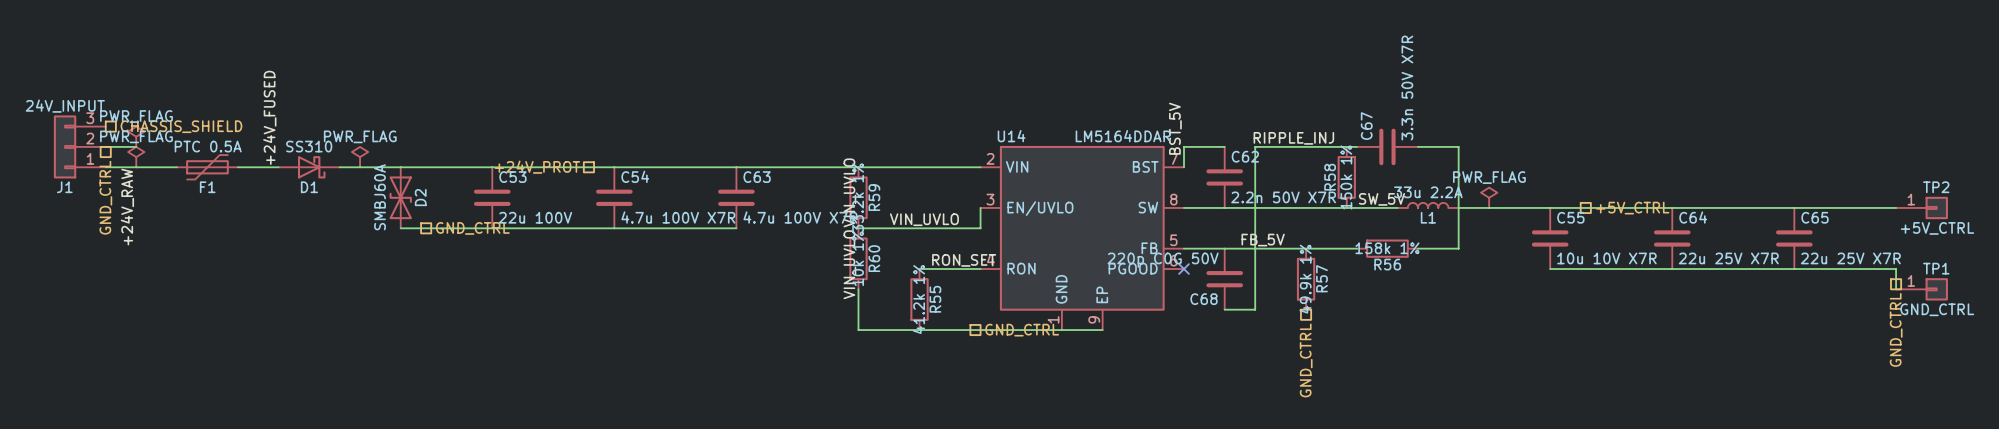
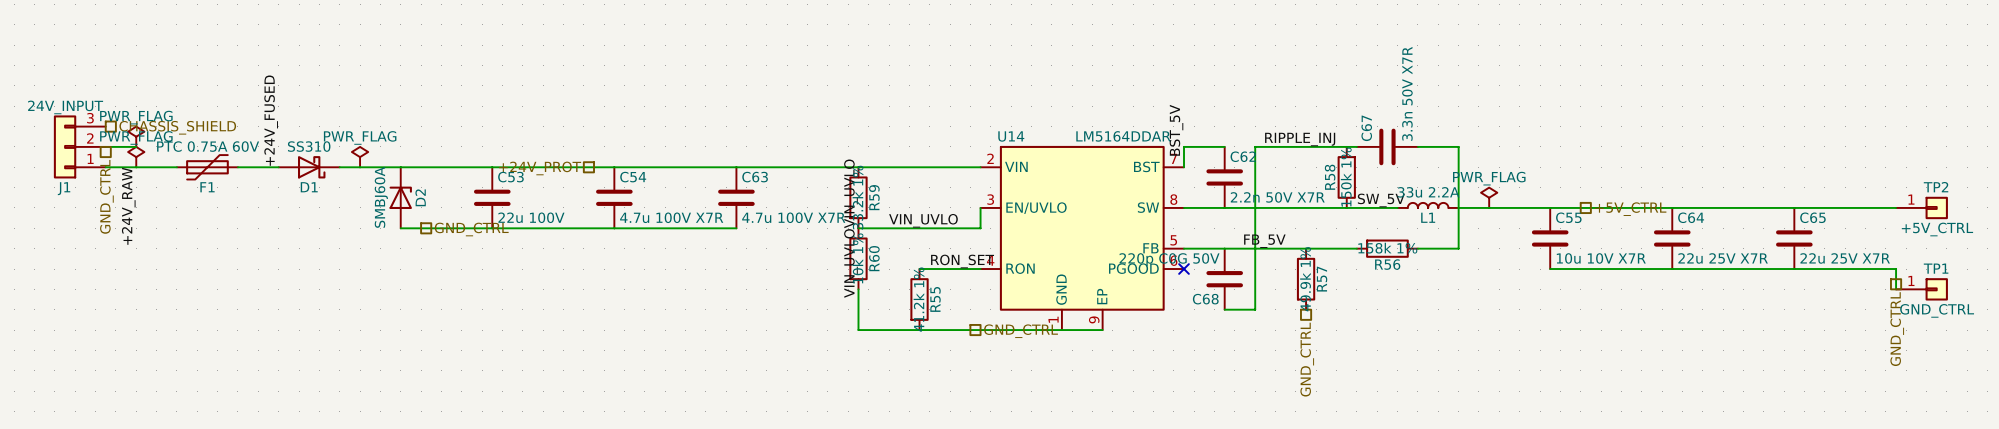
F1 value: PTC 0.5A (208, 146) -> PTC 0.75A 60V (208, 146)
D2 symbol: [389, 167, 412, 229] -> [389, 167, 412, 229]

